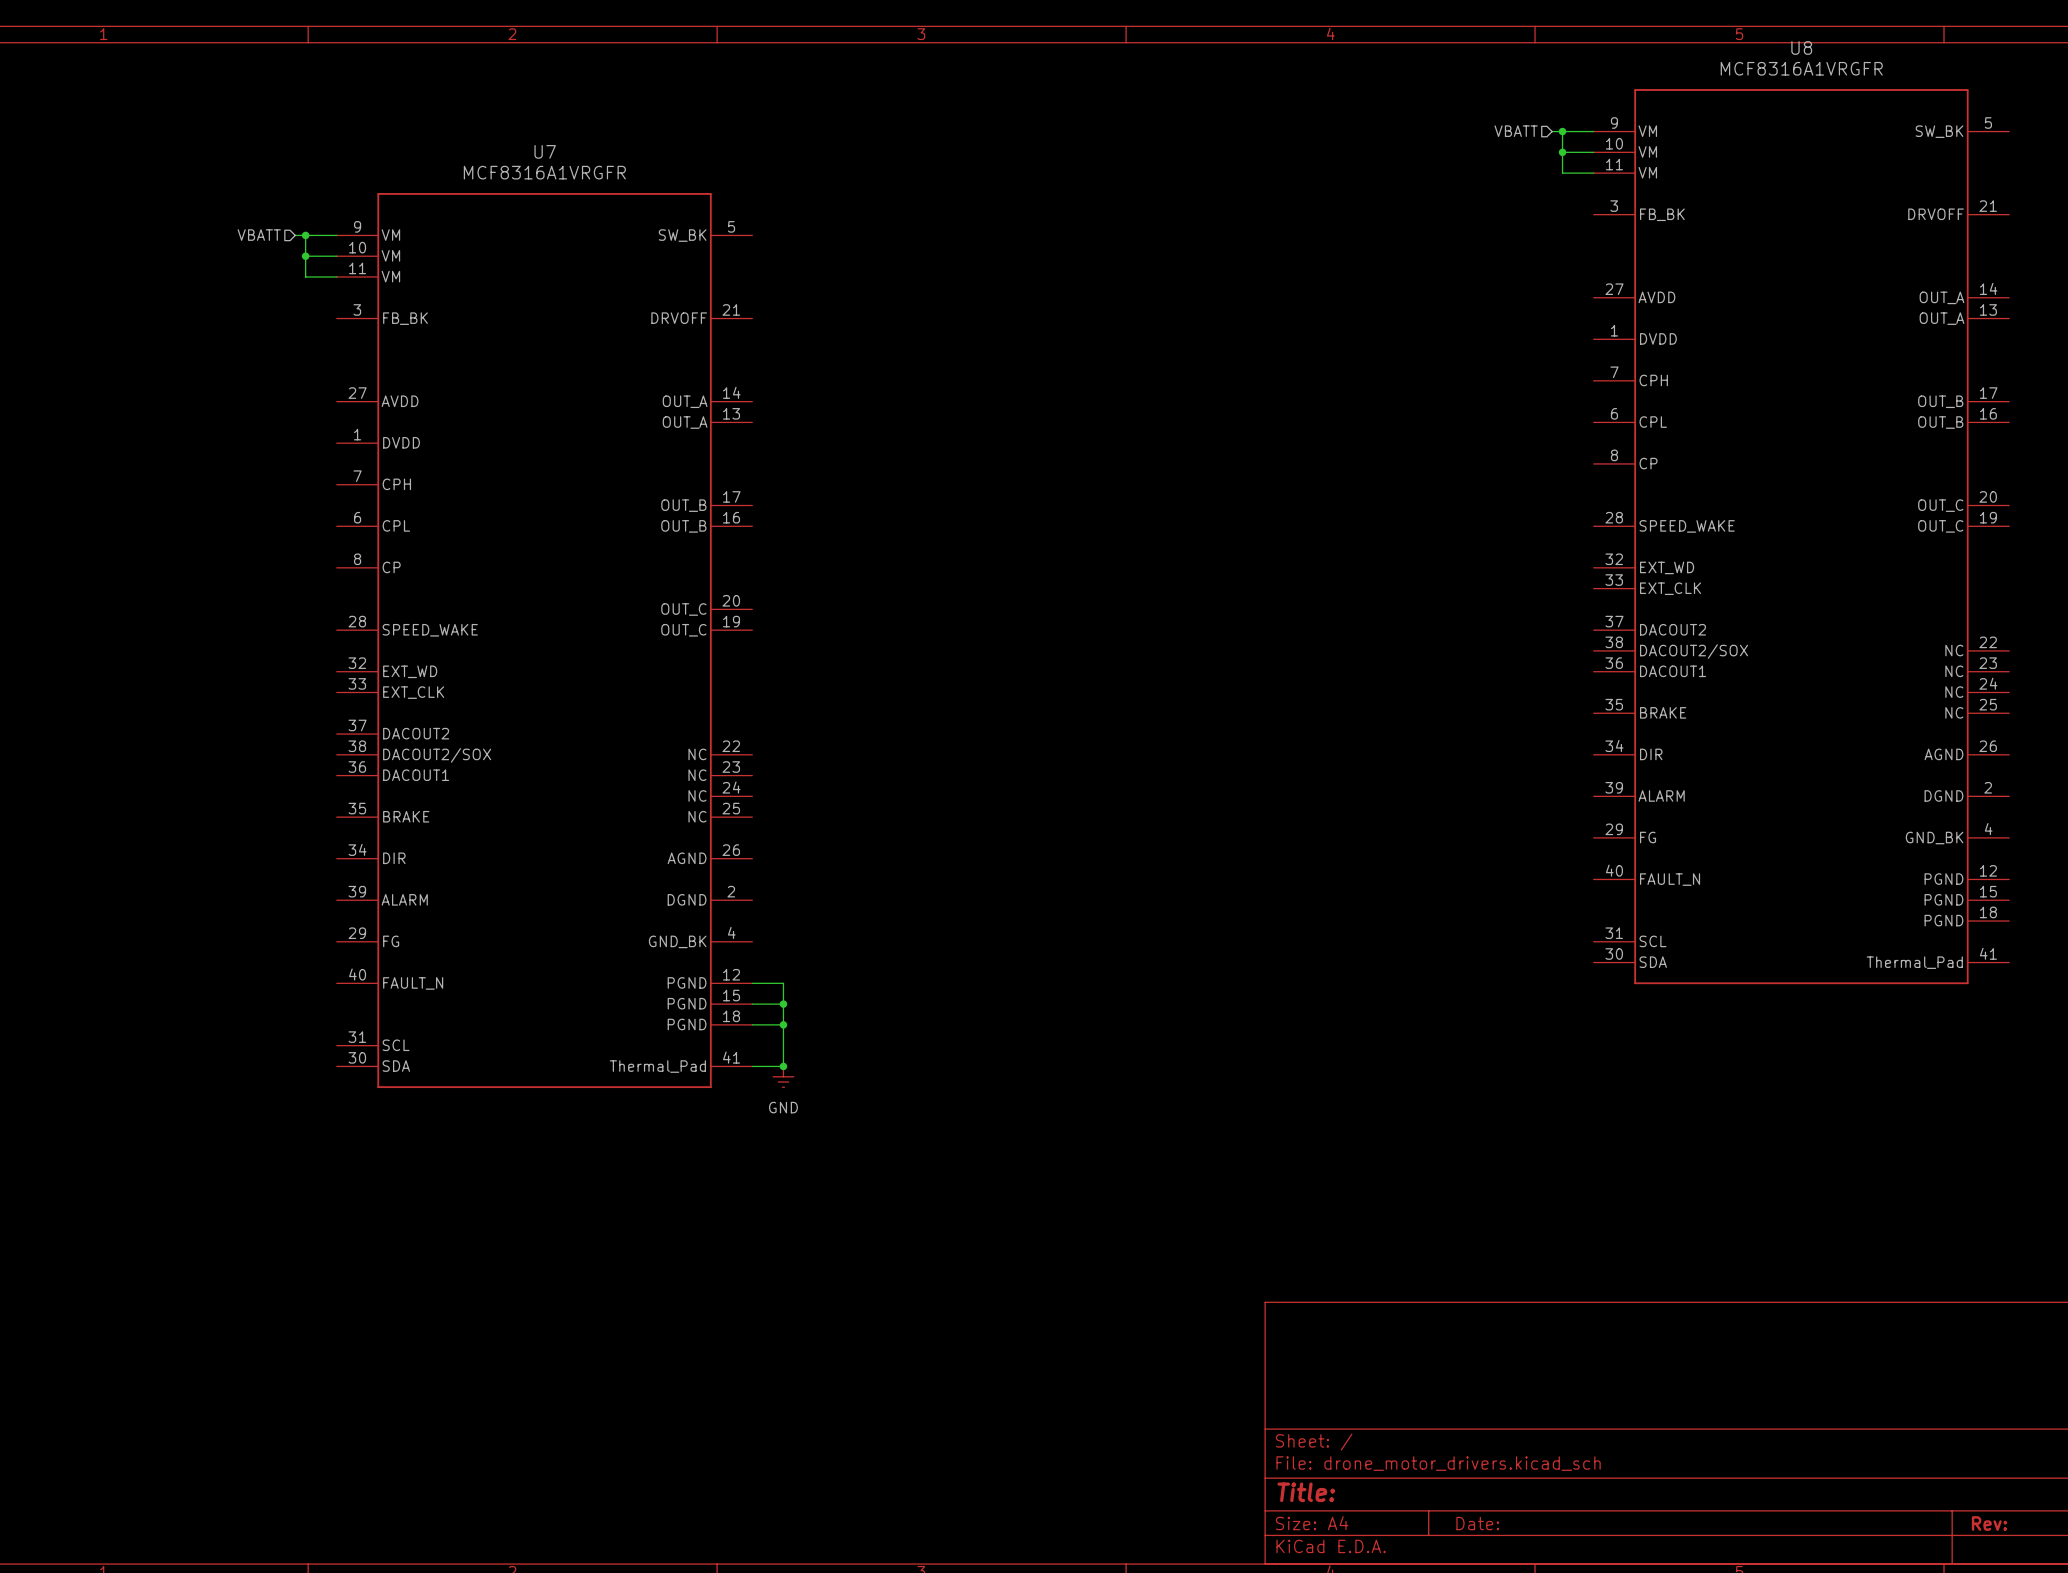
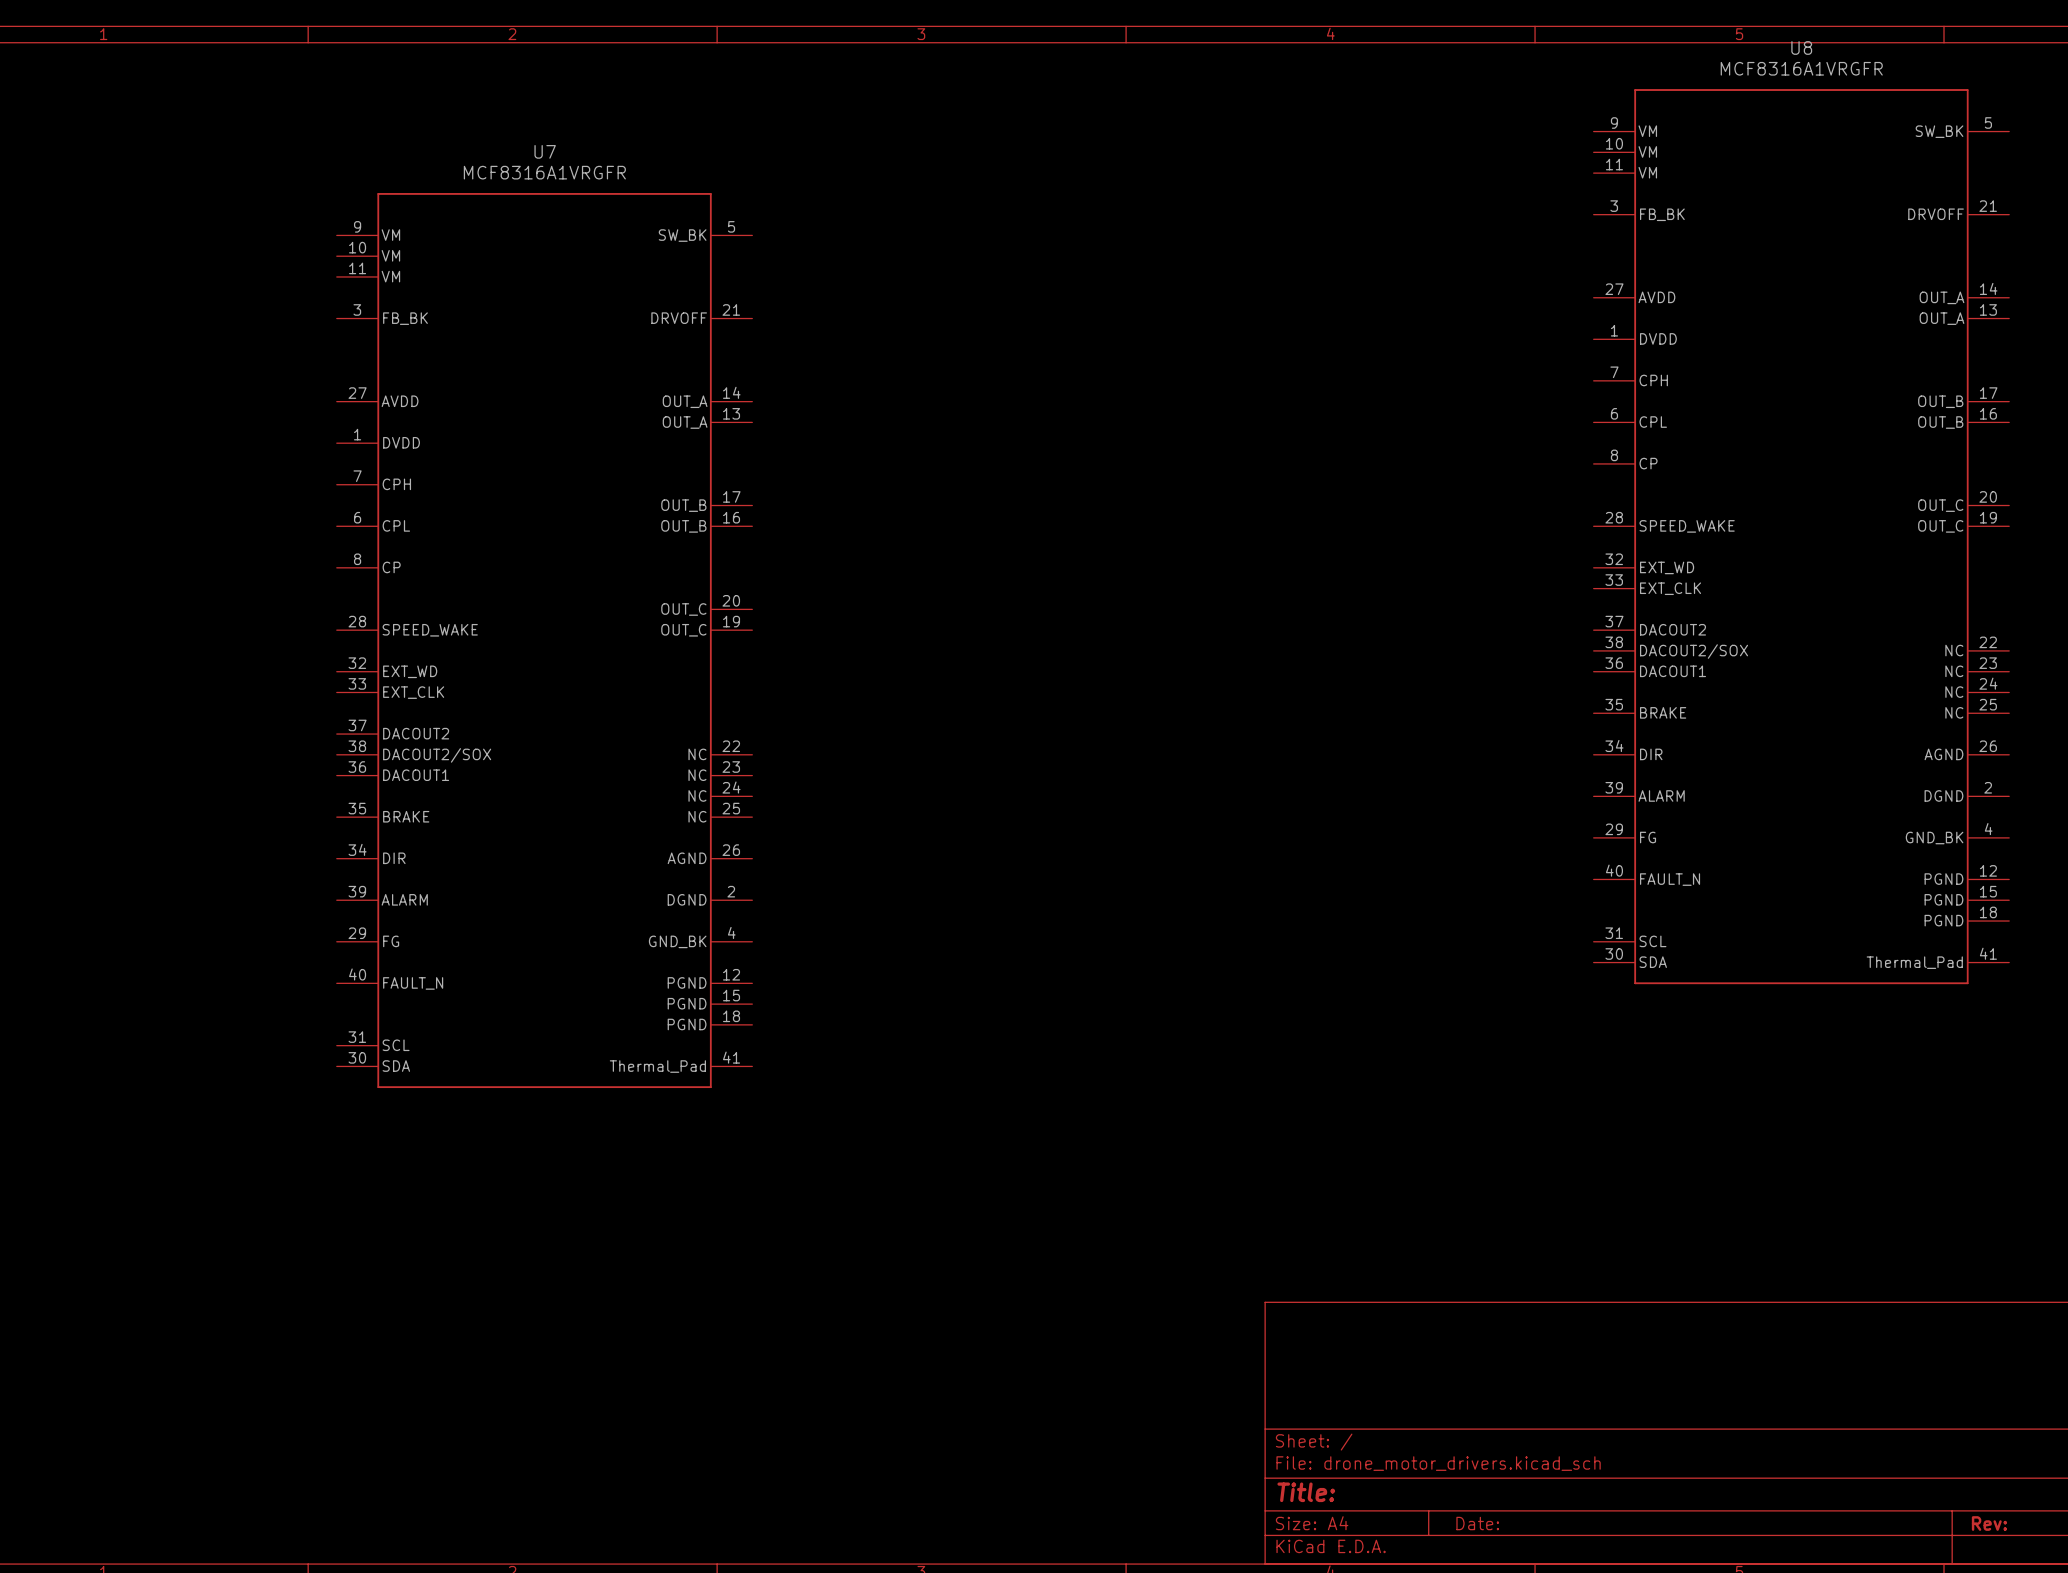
hierarchical label: VBATT (1516, 131) -> none
wire: (1552, 131) (1593, 131) -> none
wire: (1562, 131) (1562, 173) (1593, 173) -> none
junction: (1562, 131) -> none
wire: (1562, 152) (1593, 152) -> none
junction: (1562, 152) -> none
hierarchical label: VBATT (259, 235) -> none
wire: (295, 235) (336, 235) -> none
wire: (305, 235) (305, 276) (336, 276) -> none
junction: (305, 235) -> none
wire: (305, 256) (336, 256) -> none
junction: (305, 256) -> none
wire: (752, 983) (783, 983) (783, 1066) (752, 1066) -> none
wire: (752, 1004) (783, 1004) -> none
junction: (783, 1004) -> none
wire: (752, 1024) (783, 1024) -> none
junction: (783, 1024) -> none
junction: (783, 1066) -> none
power symbol: GND (783, 1076) -> none

